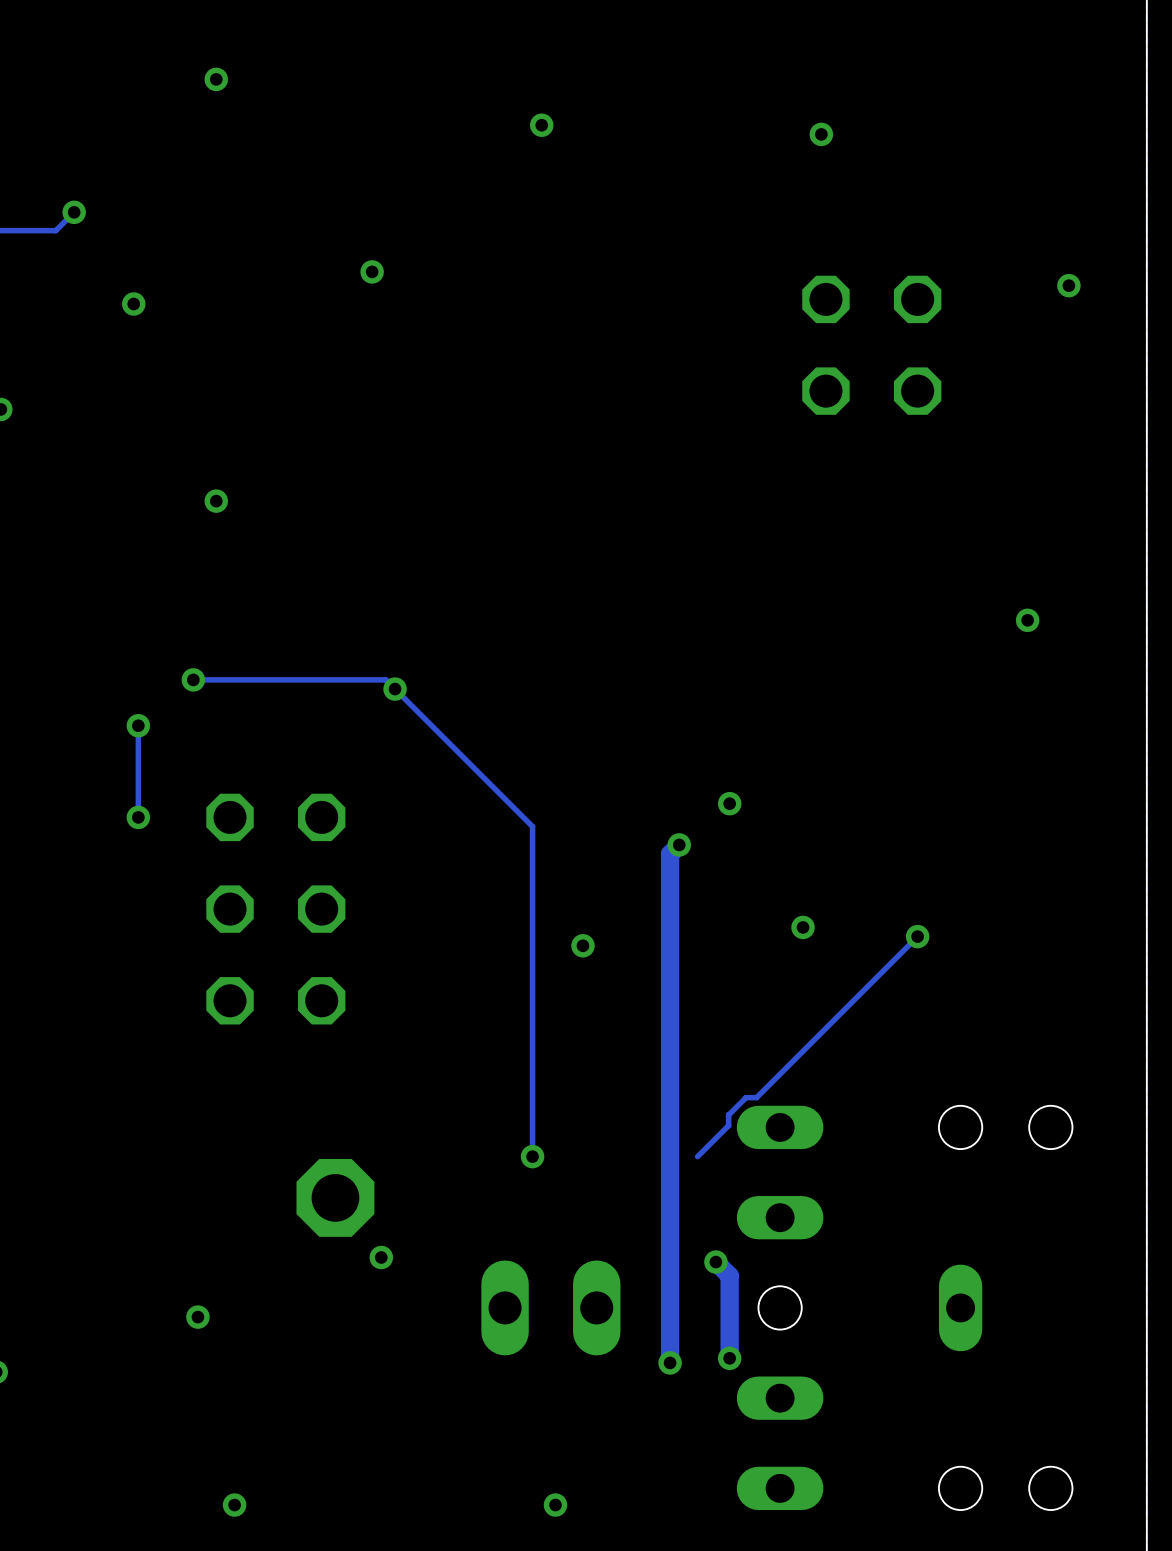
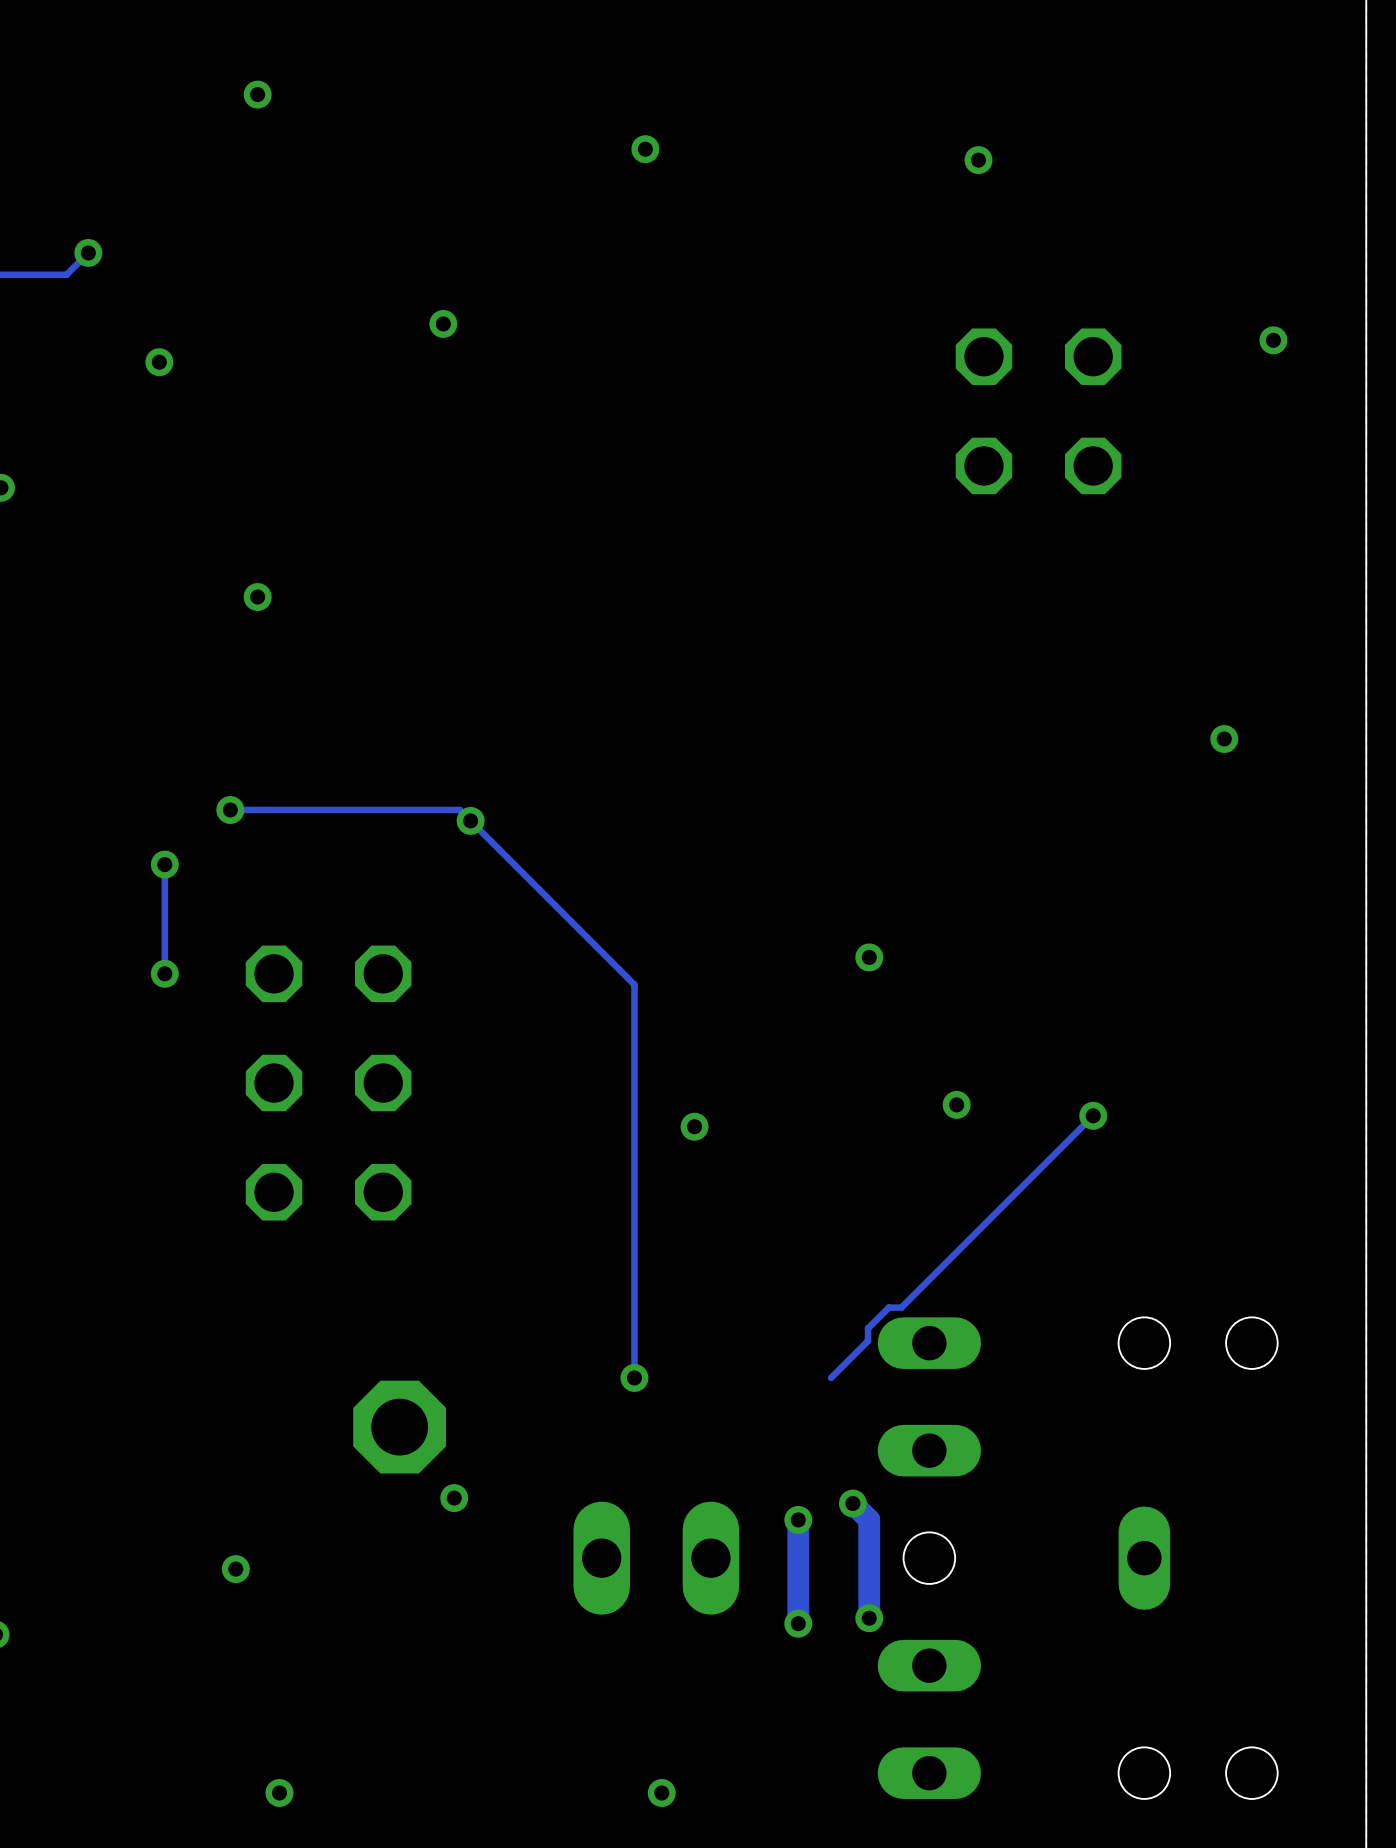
track: (679, 844) (670, 854) (670, 1275) -> none
via: (679, 844) -> none
via: none -> (798, 1519)

